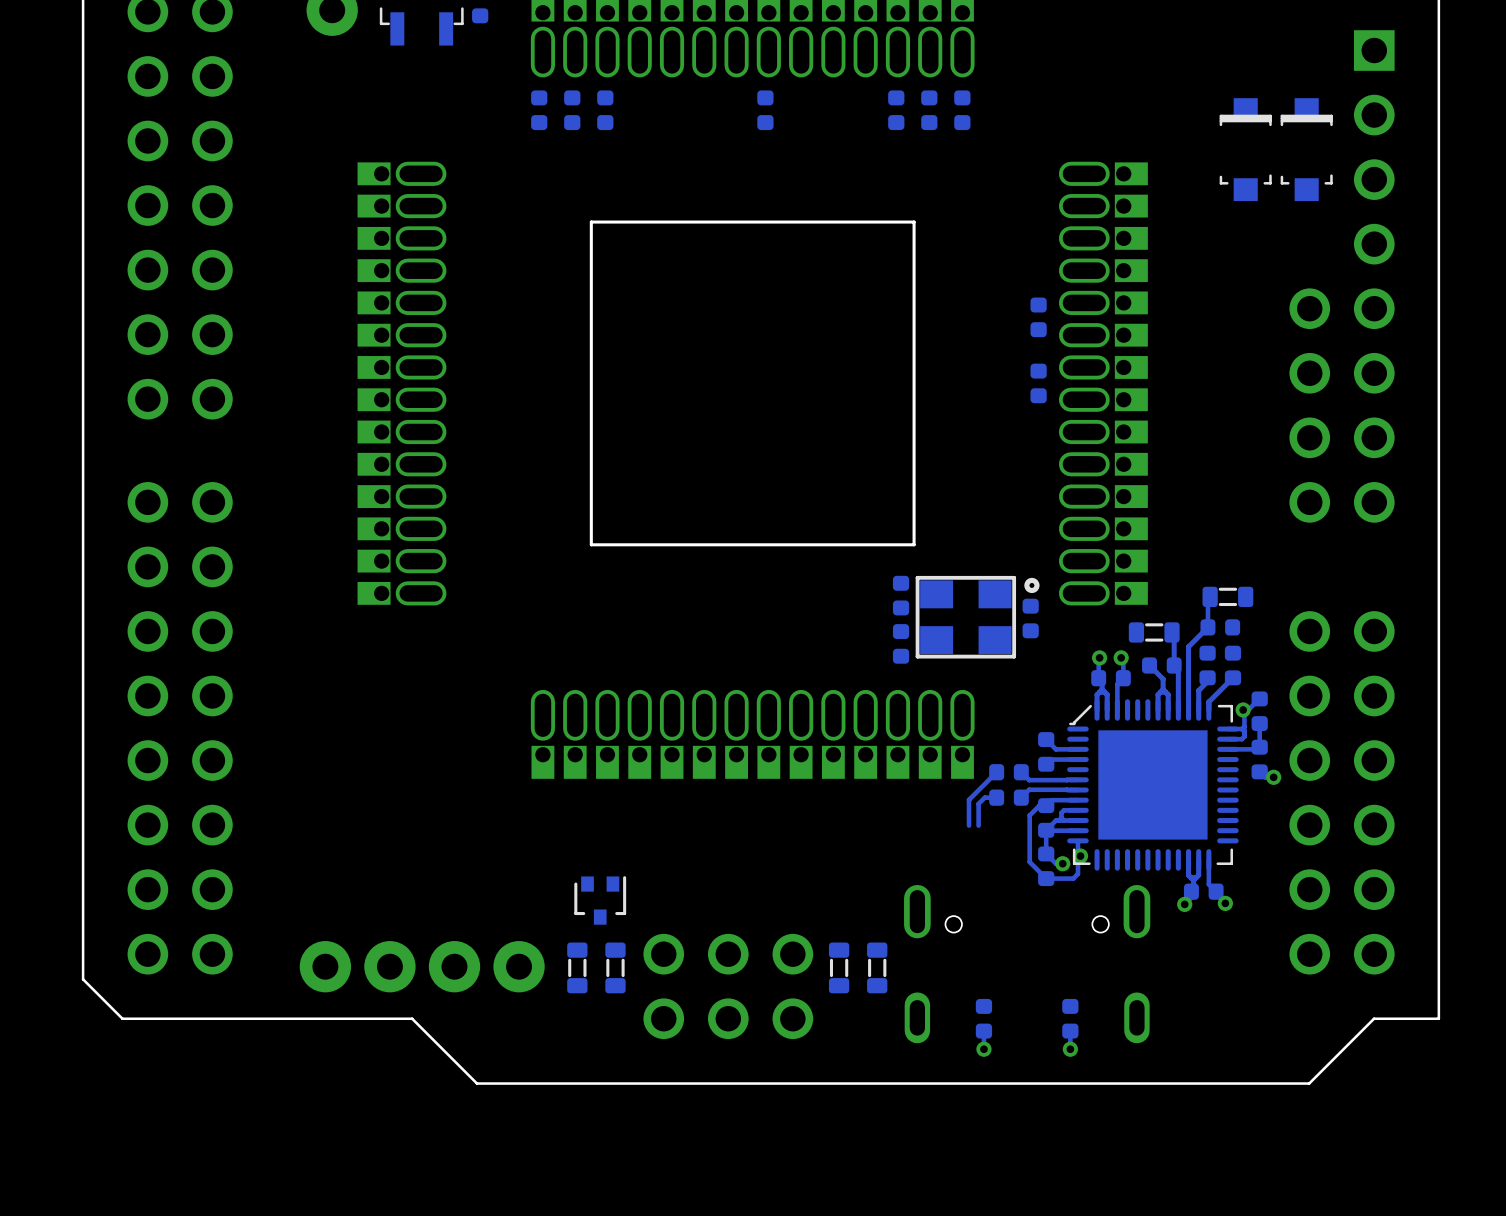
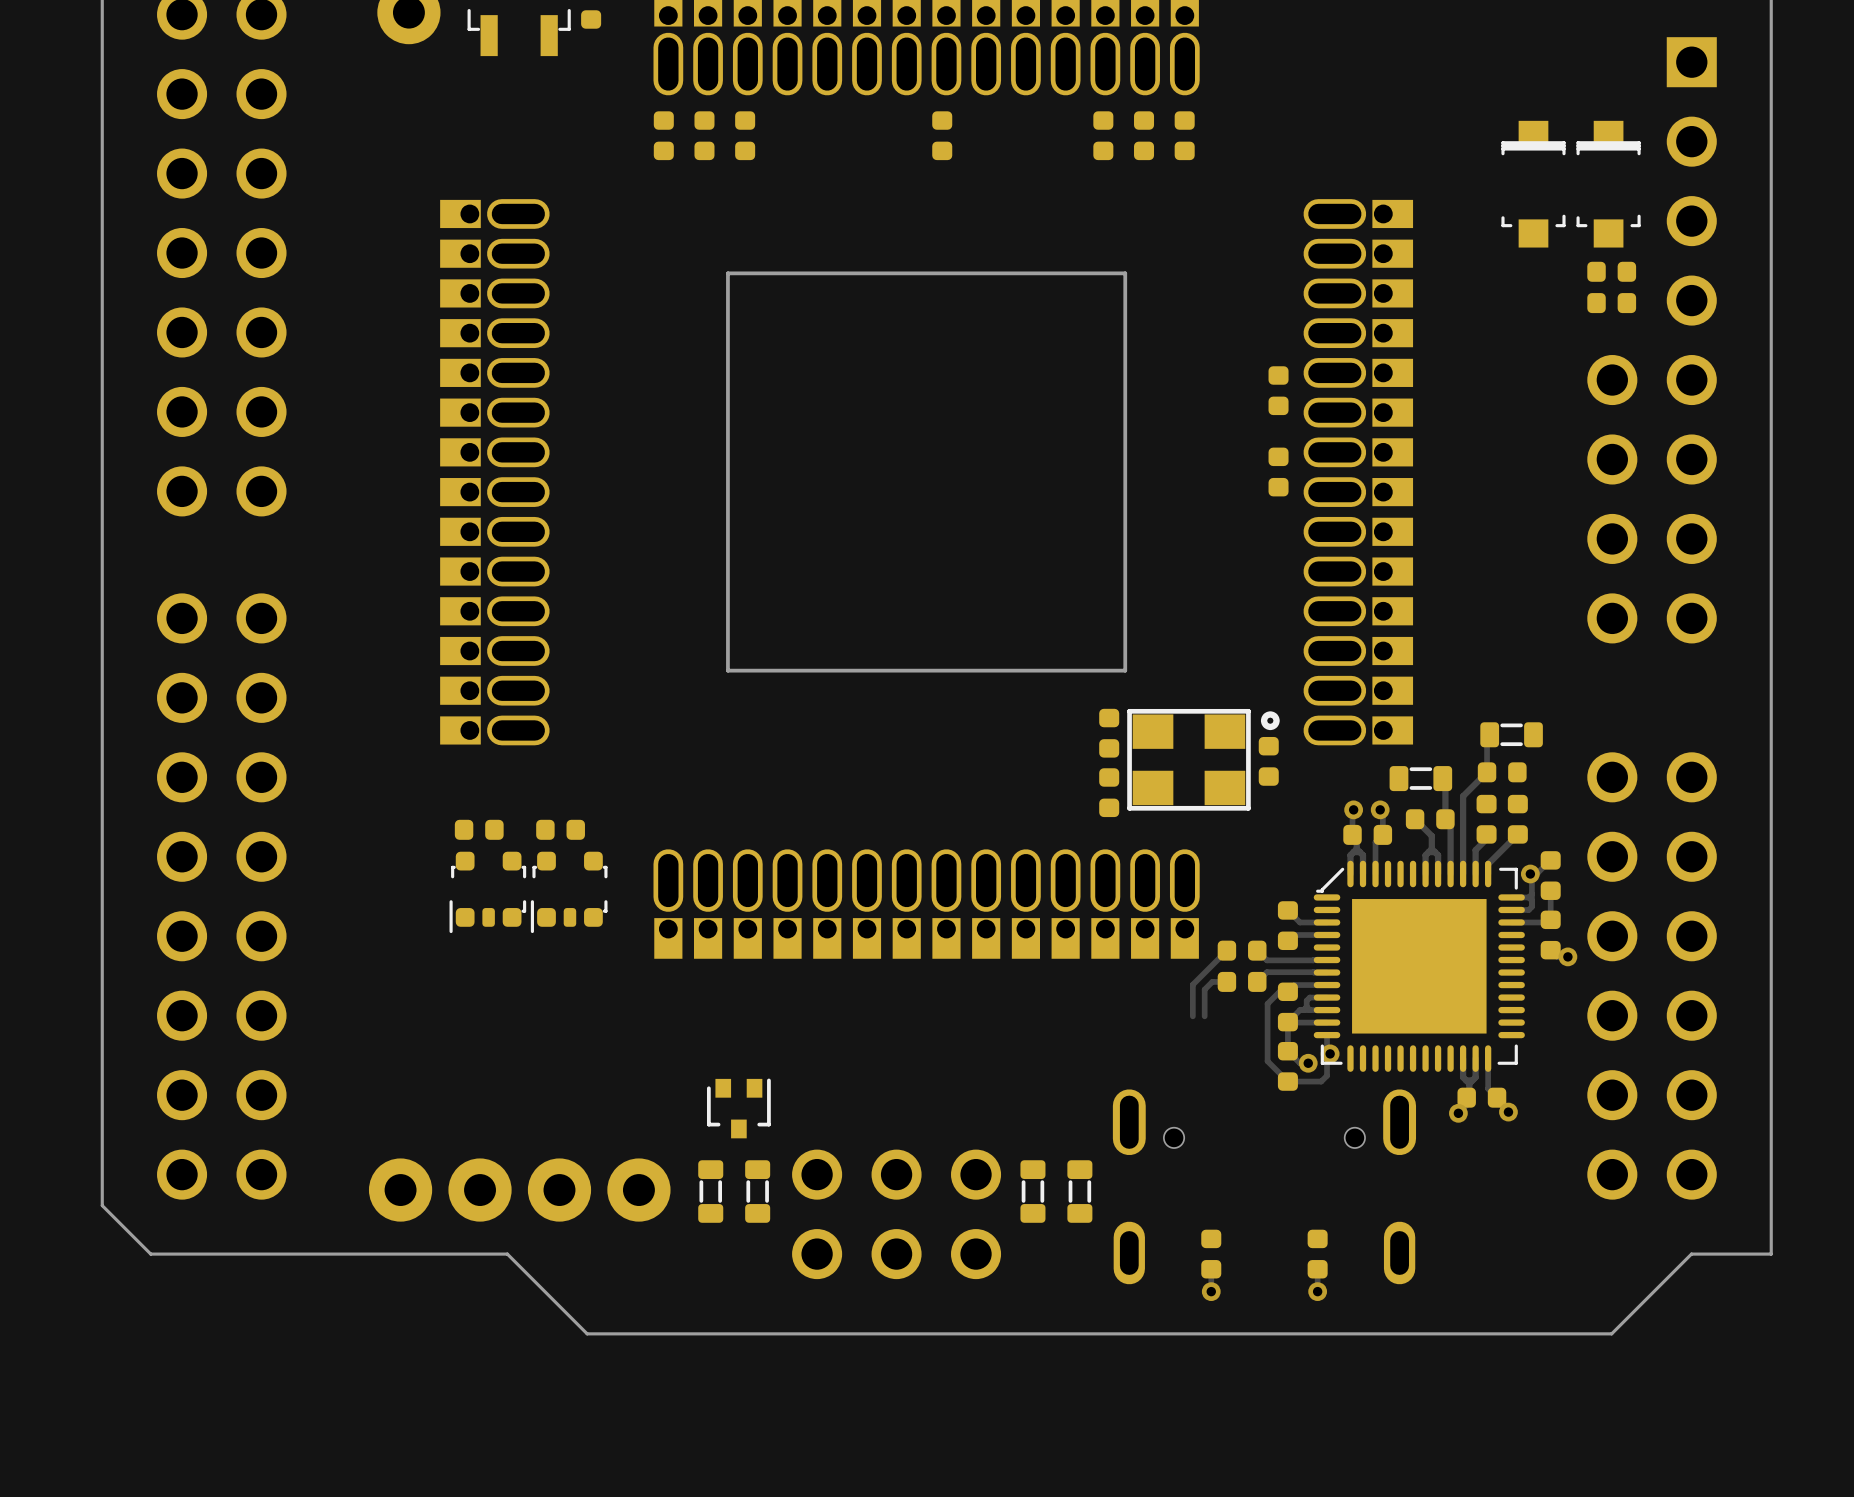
part: none -> (1611, 271)
part: none -> (1611, 303)
part: none -> (479, 829)
part: none -> (560, 829)
part: none -> (487, 892)
part: none -> (569, 892)

